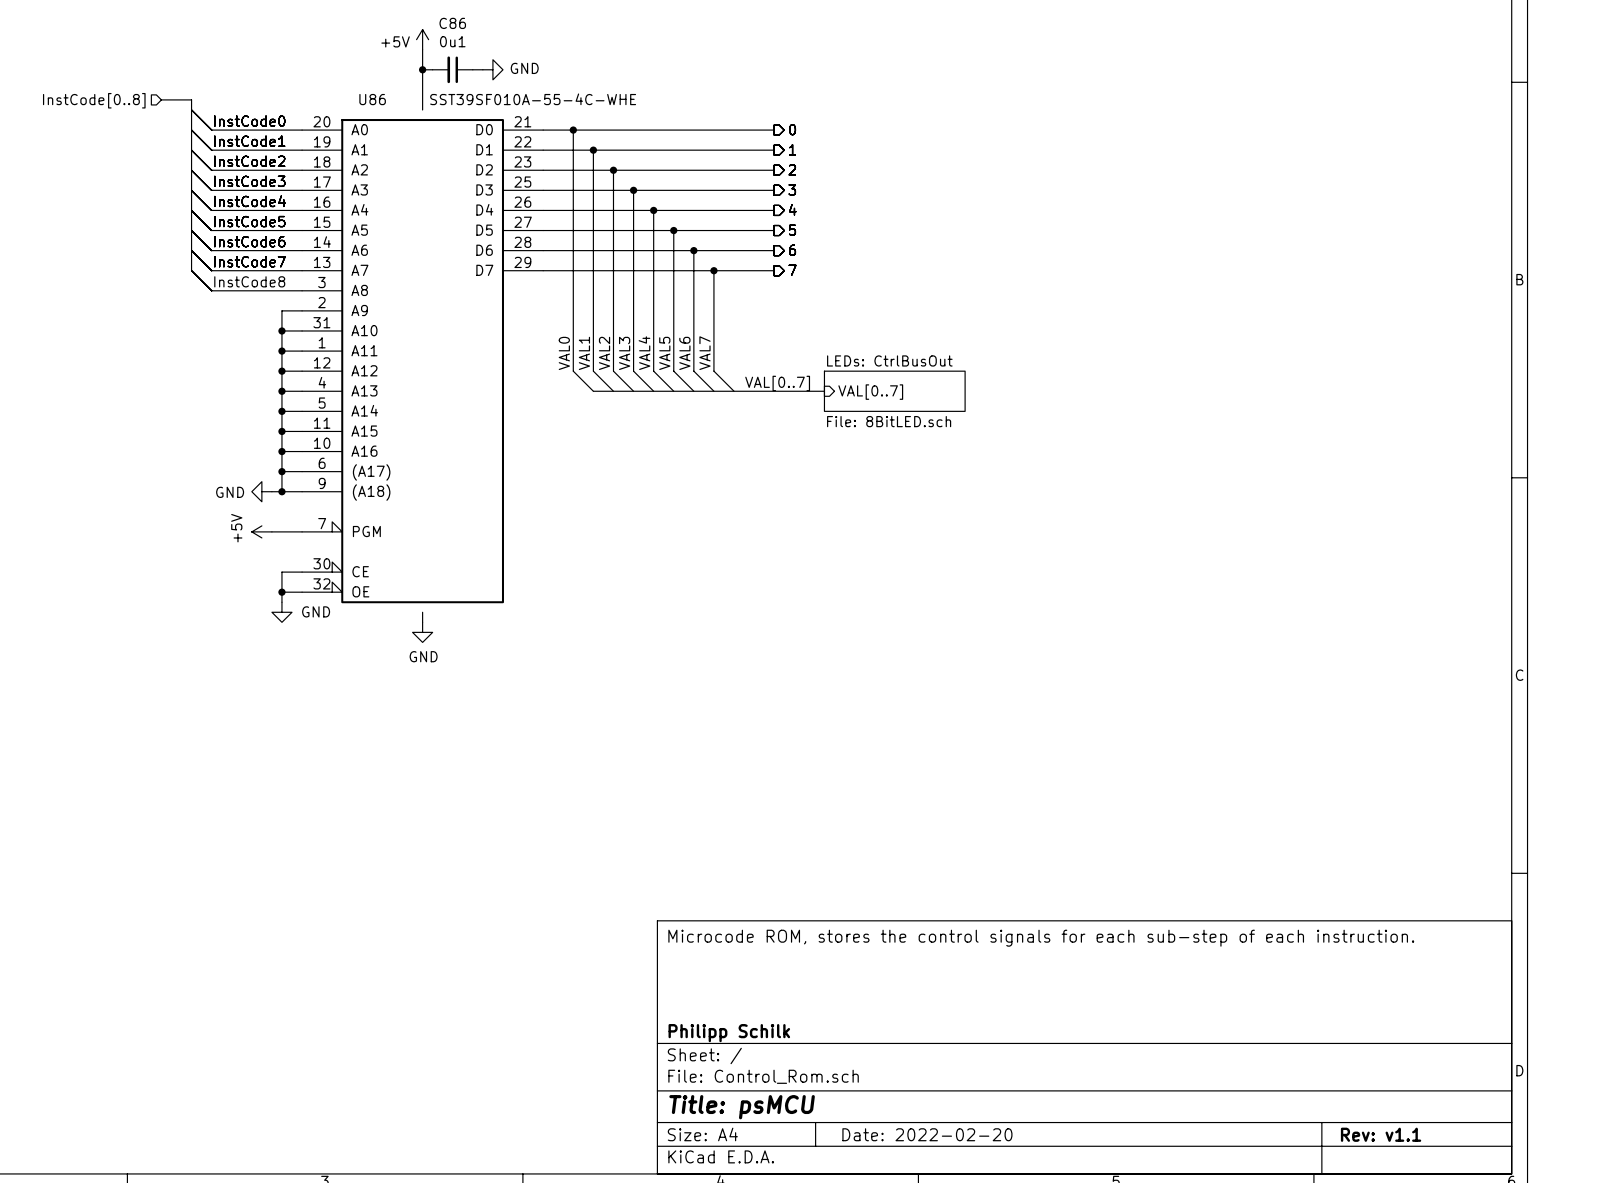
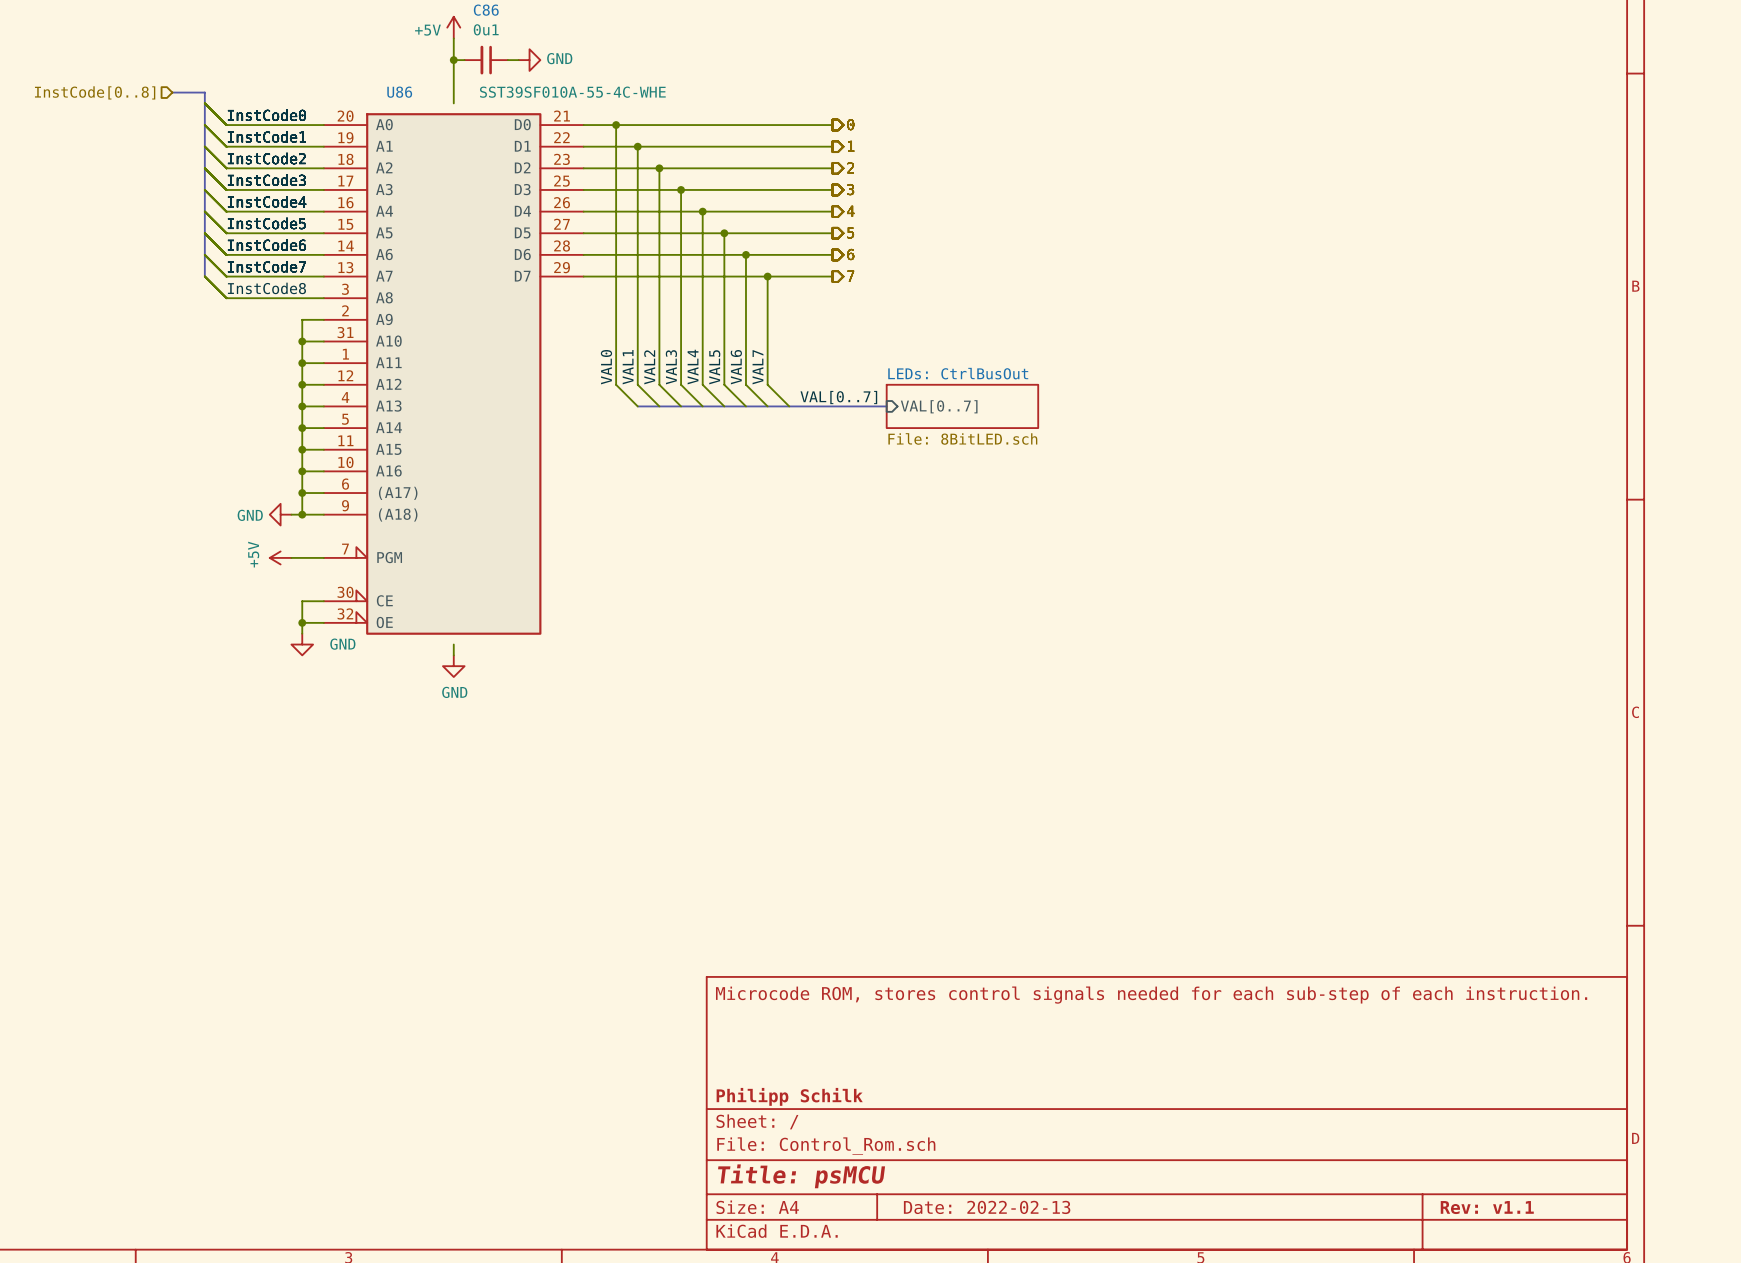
title block: Microcode ROM, stores the control signals for each sub-step of each instruction. (1041, 938) -> Microcode ROM, stores control signals needed for each sub-step of each instruction. (1151, 995)
title block: Date: 2022-02-20 (927, 1134) -> Date: 2022-02-13 (987, 1207)

